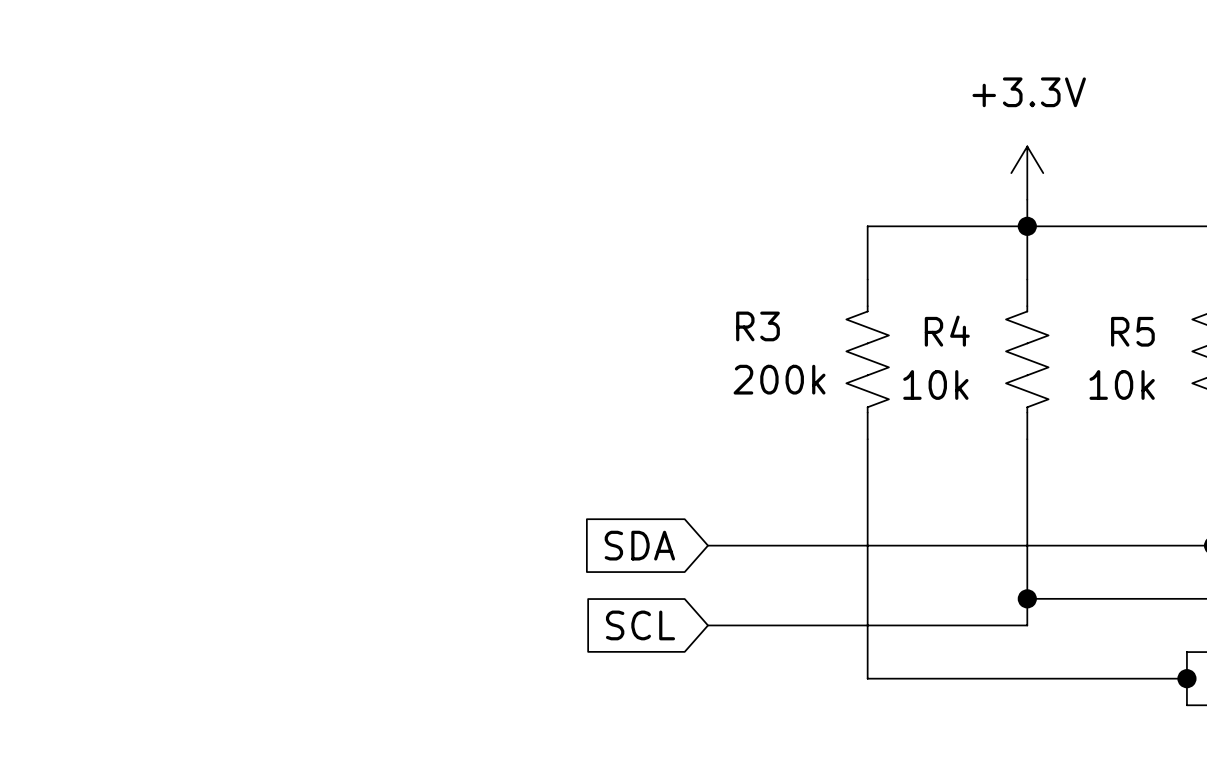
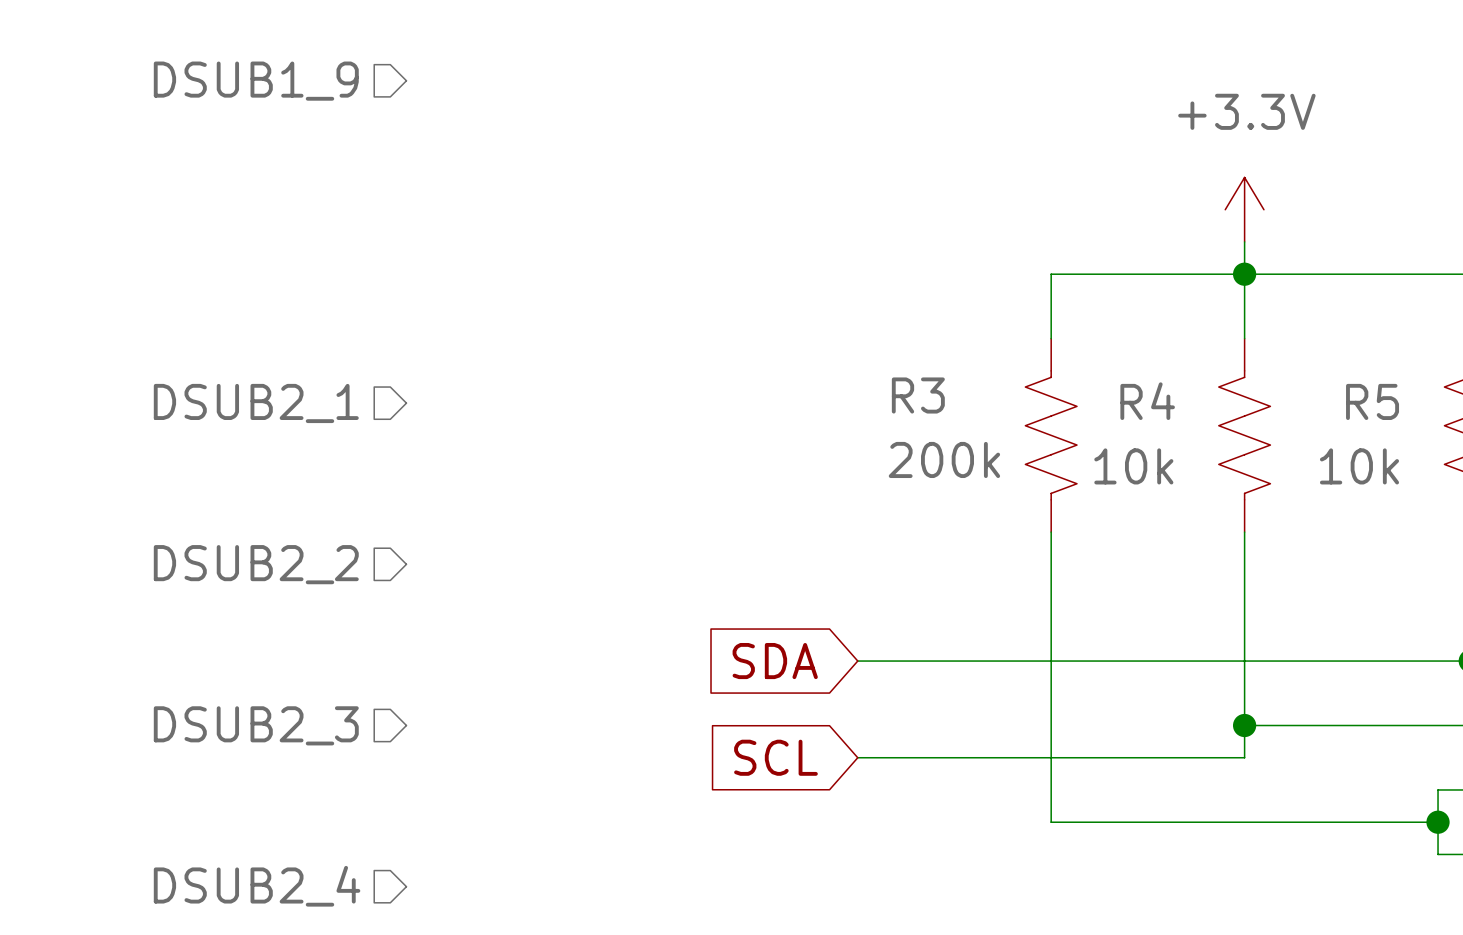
hierarchical label: none -> DSUB1_9 (256, 81)
hierarchical label: none -> DSUB2_1 (256, 403)
hierarchical label: none -> DSUB2_2 (256, 564)
hierarchical label: none -> DSUB2_3 (256, 725)
hierarchical label: none -> DSUB2_4 (257, 886)

